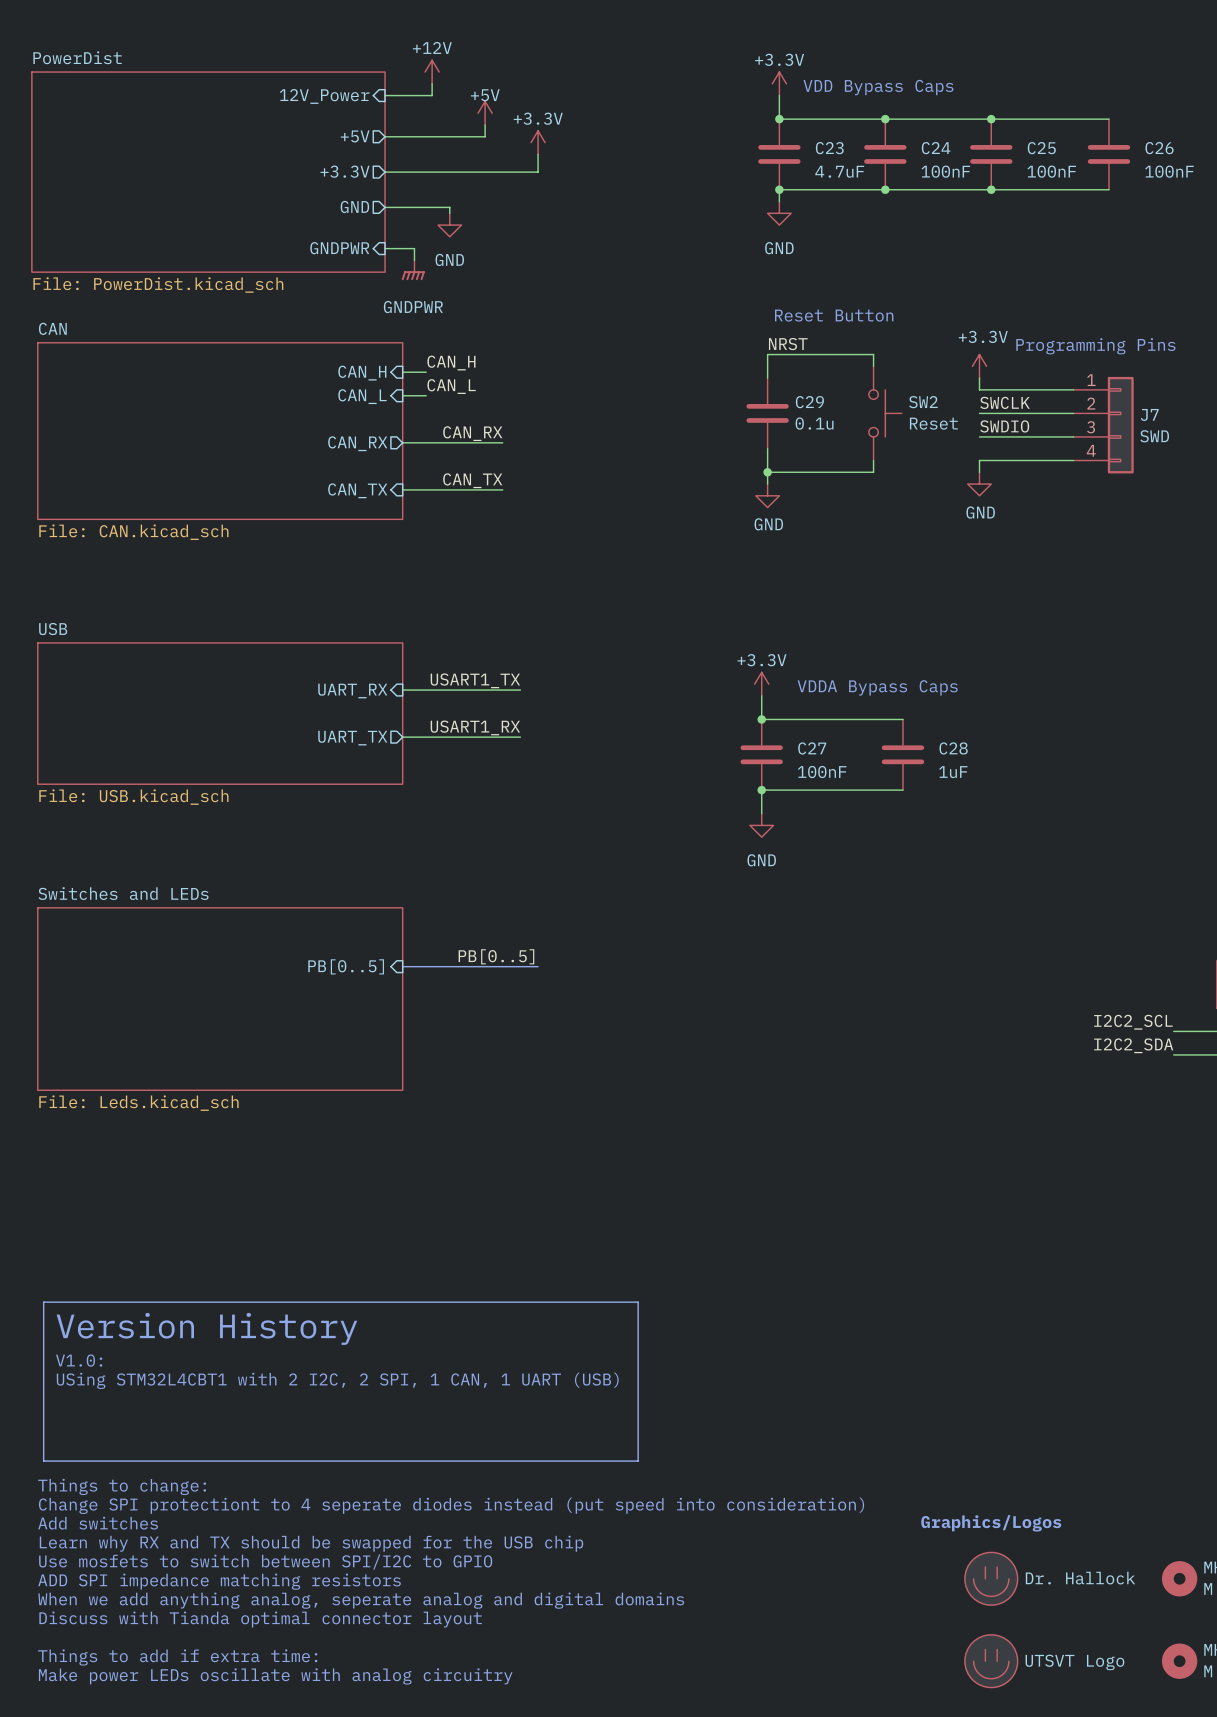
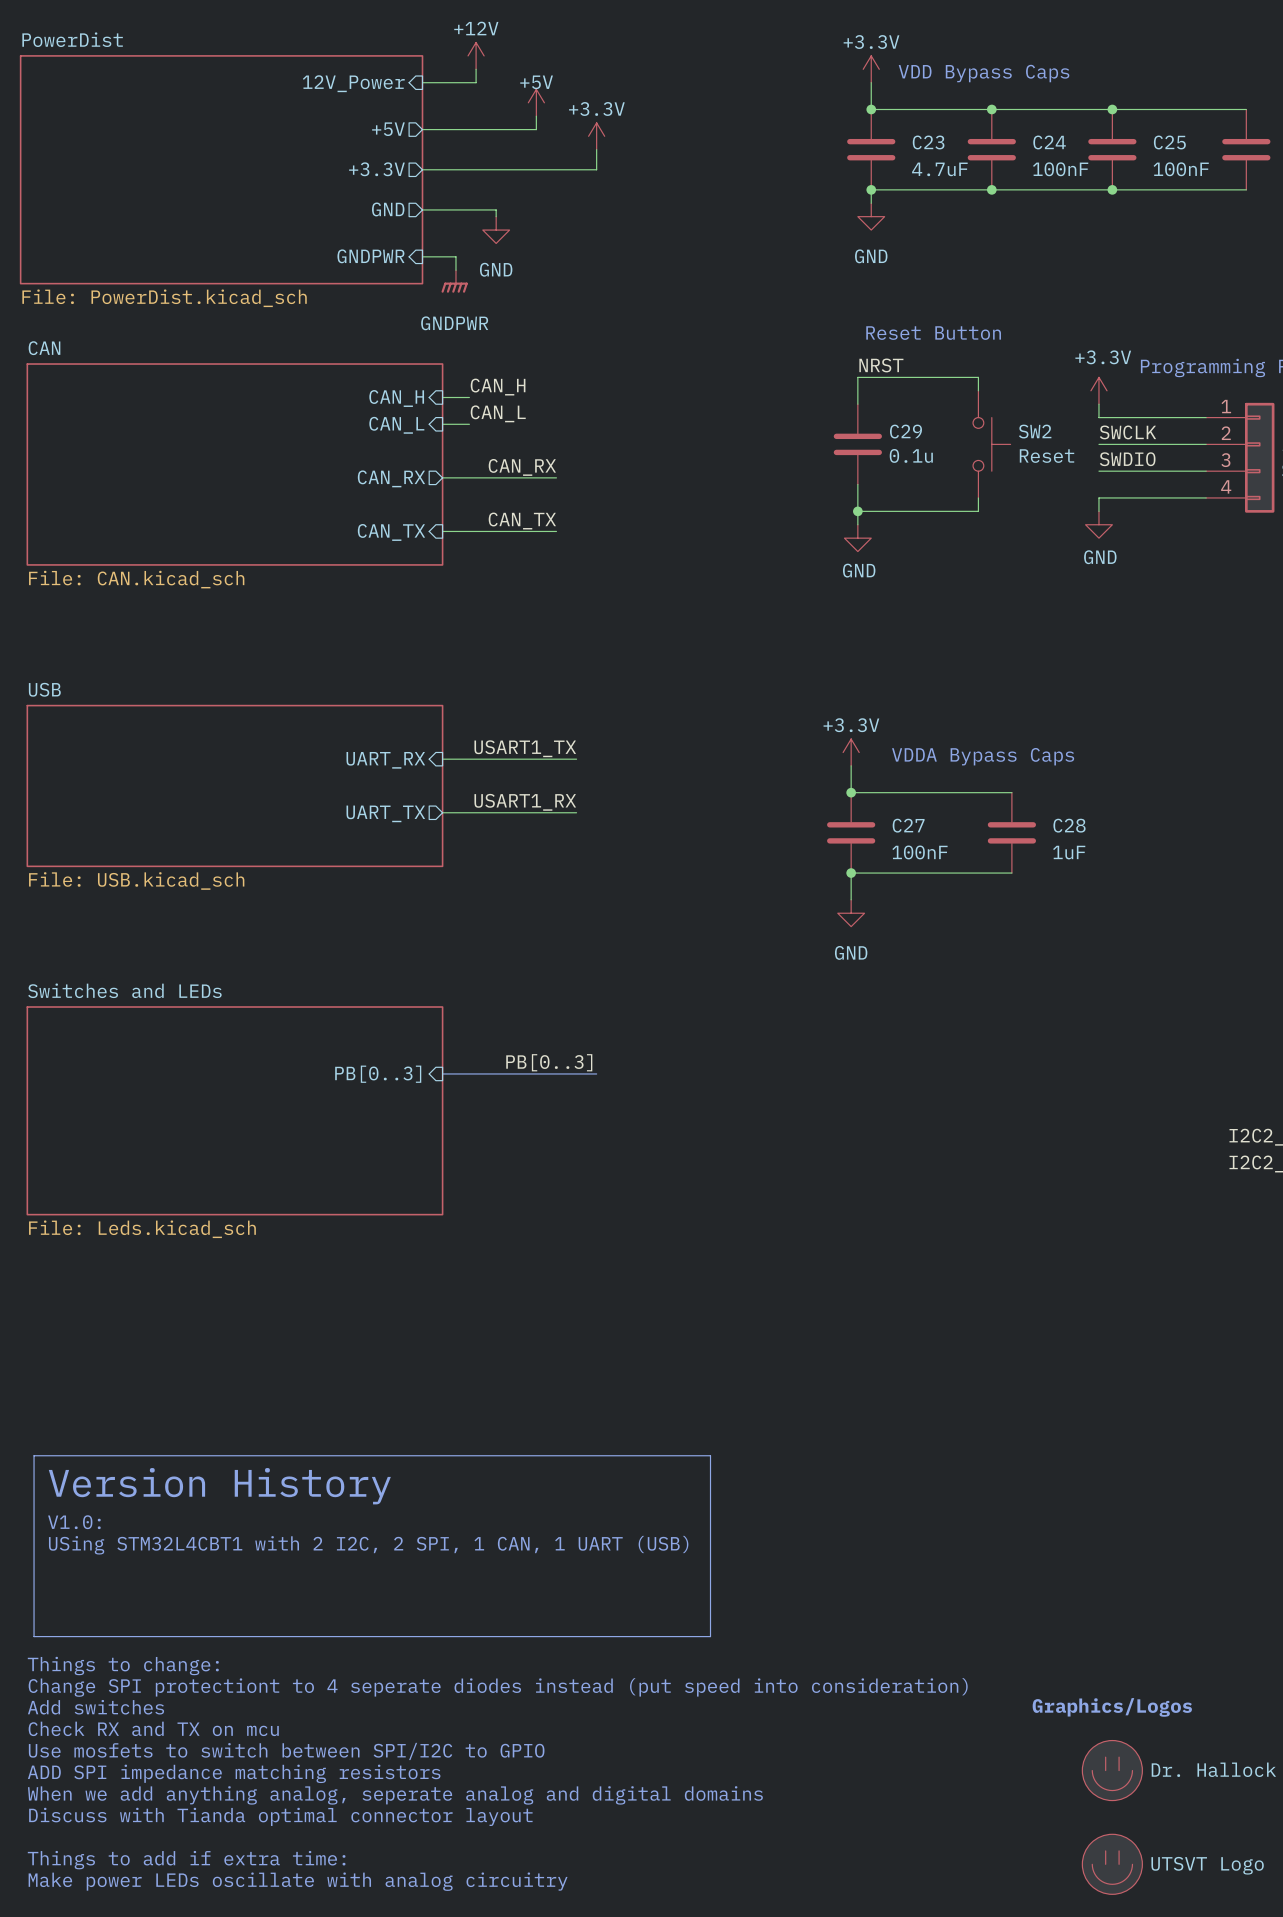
label: PB[0..5] (496, 956) -> PB[0..3] (549, 1062)
sheet pin: PB[0..5] (346, 966) -> PB[0..3] (378, 1074)
text: Learn why RX and TX should be swapped for the USB chip (311, 1543) -> Check RX and TX on mcu (153, 1728)

